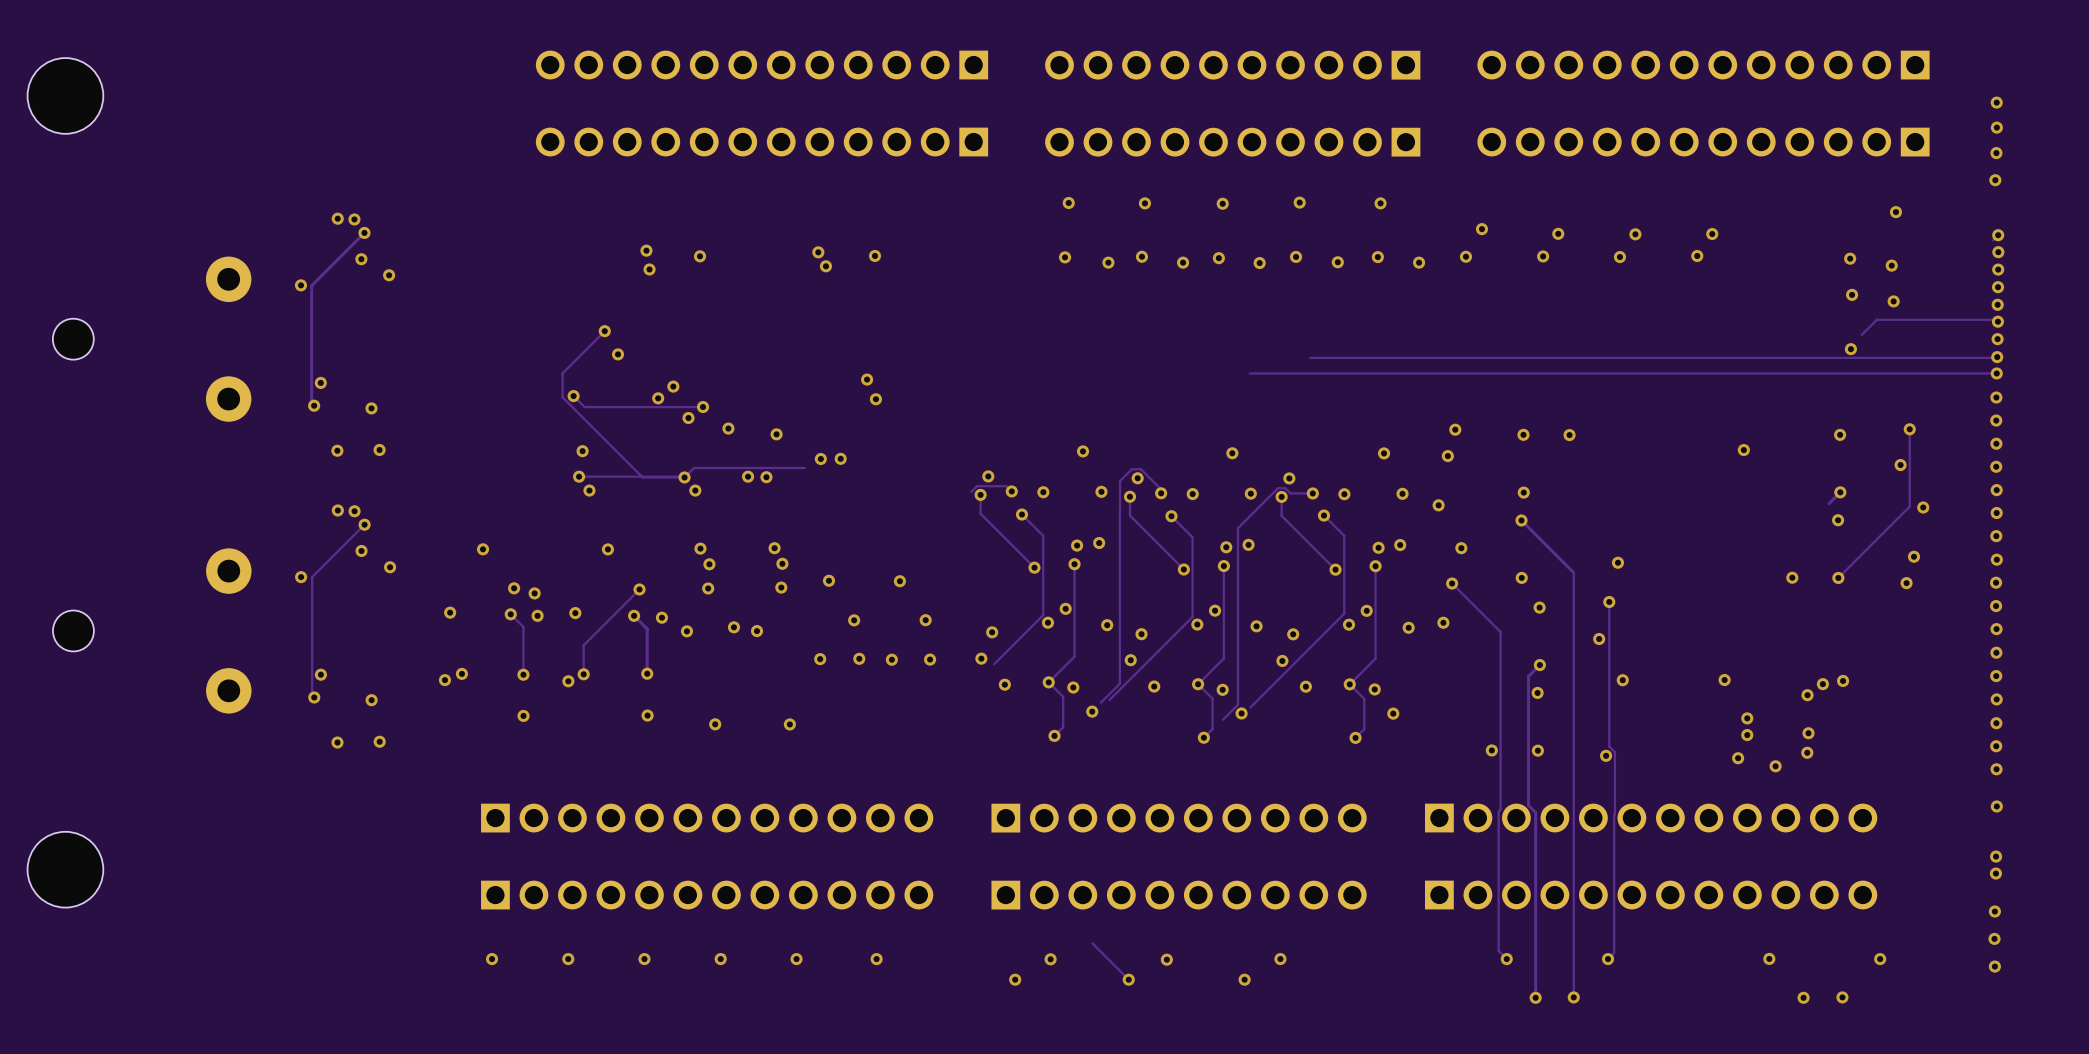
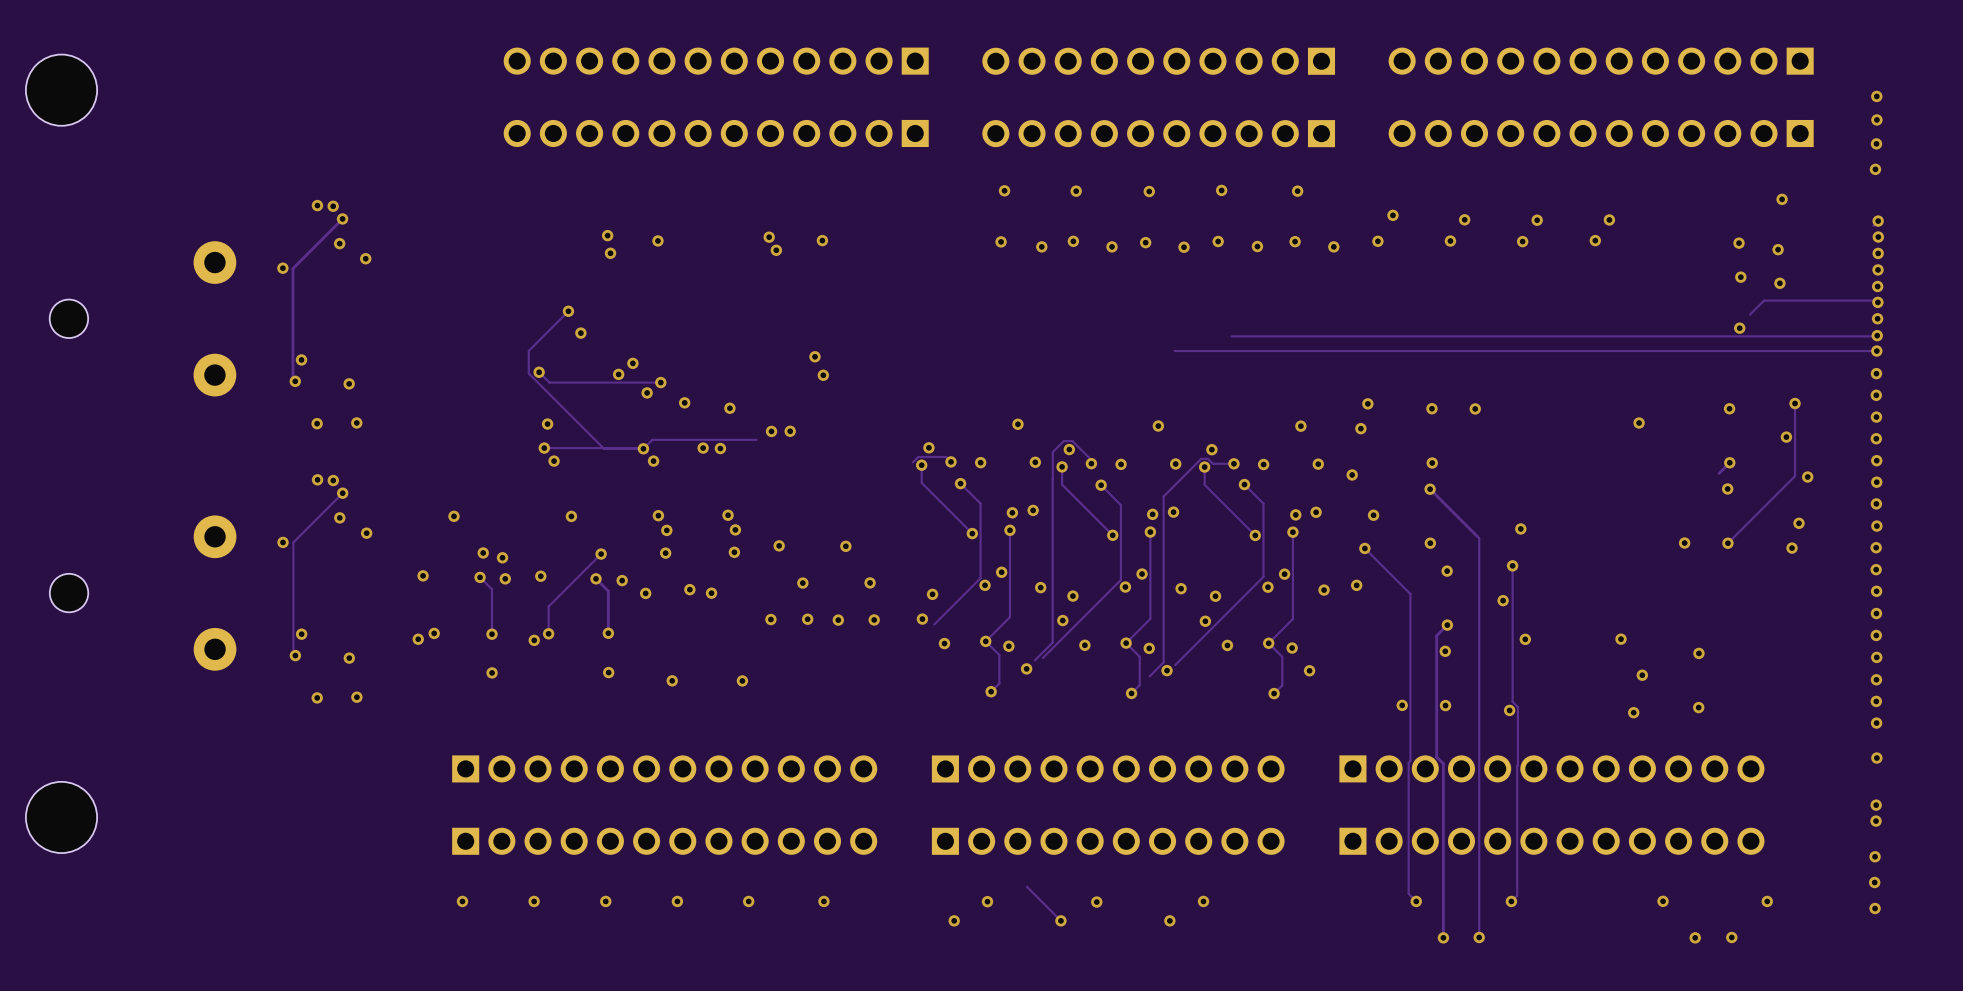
via: (1843, 680) -> none
via: (1822, 684) -> none
via: (1808, 733) -> none
via: (1747, 735) -> none
via: (1775, 766) -> none

